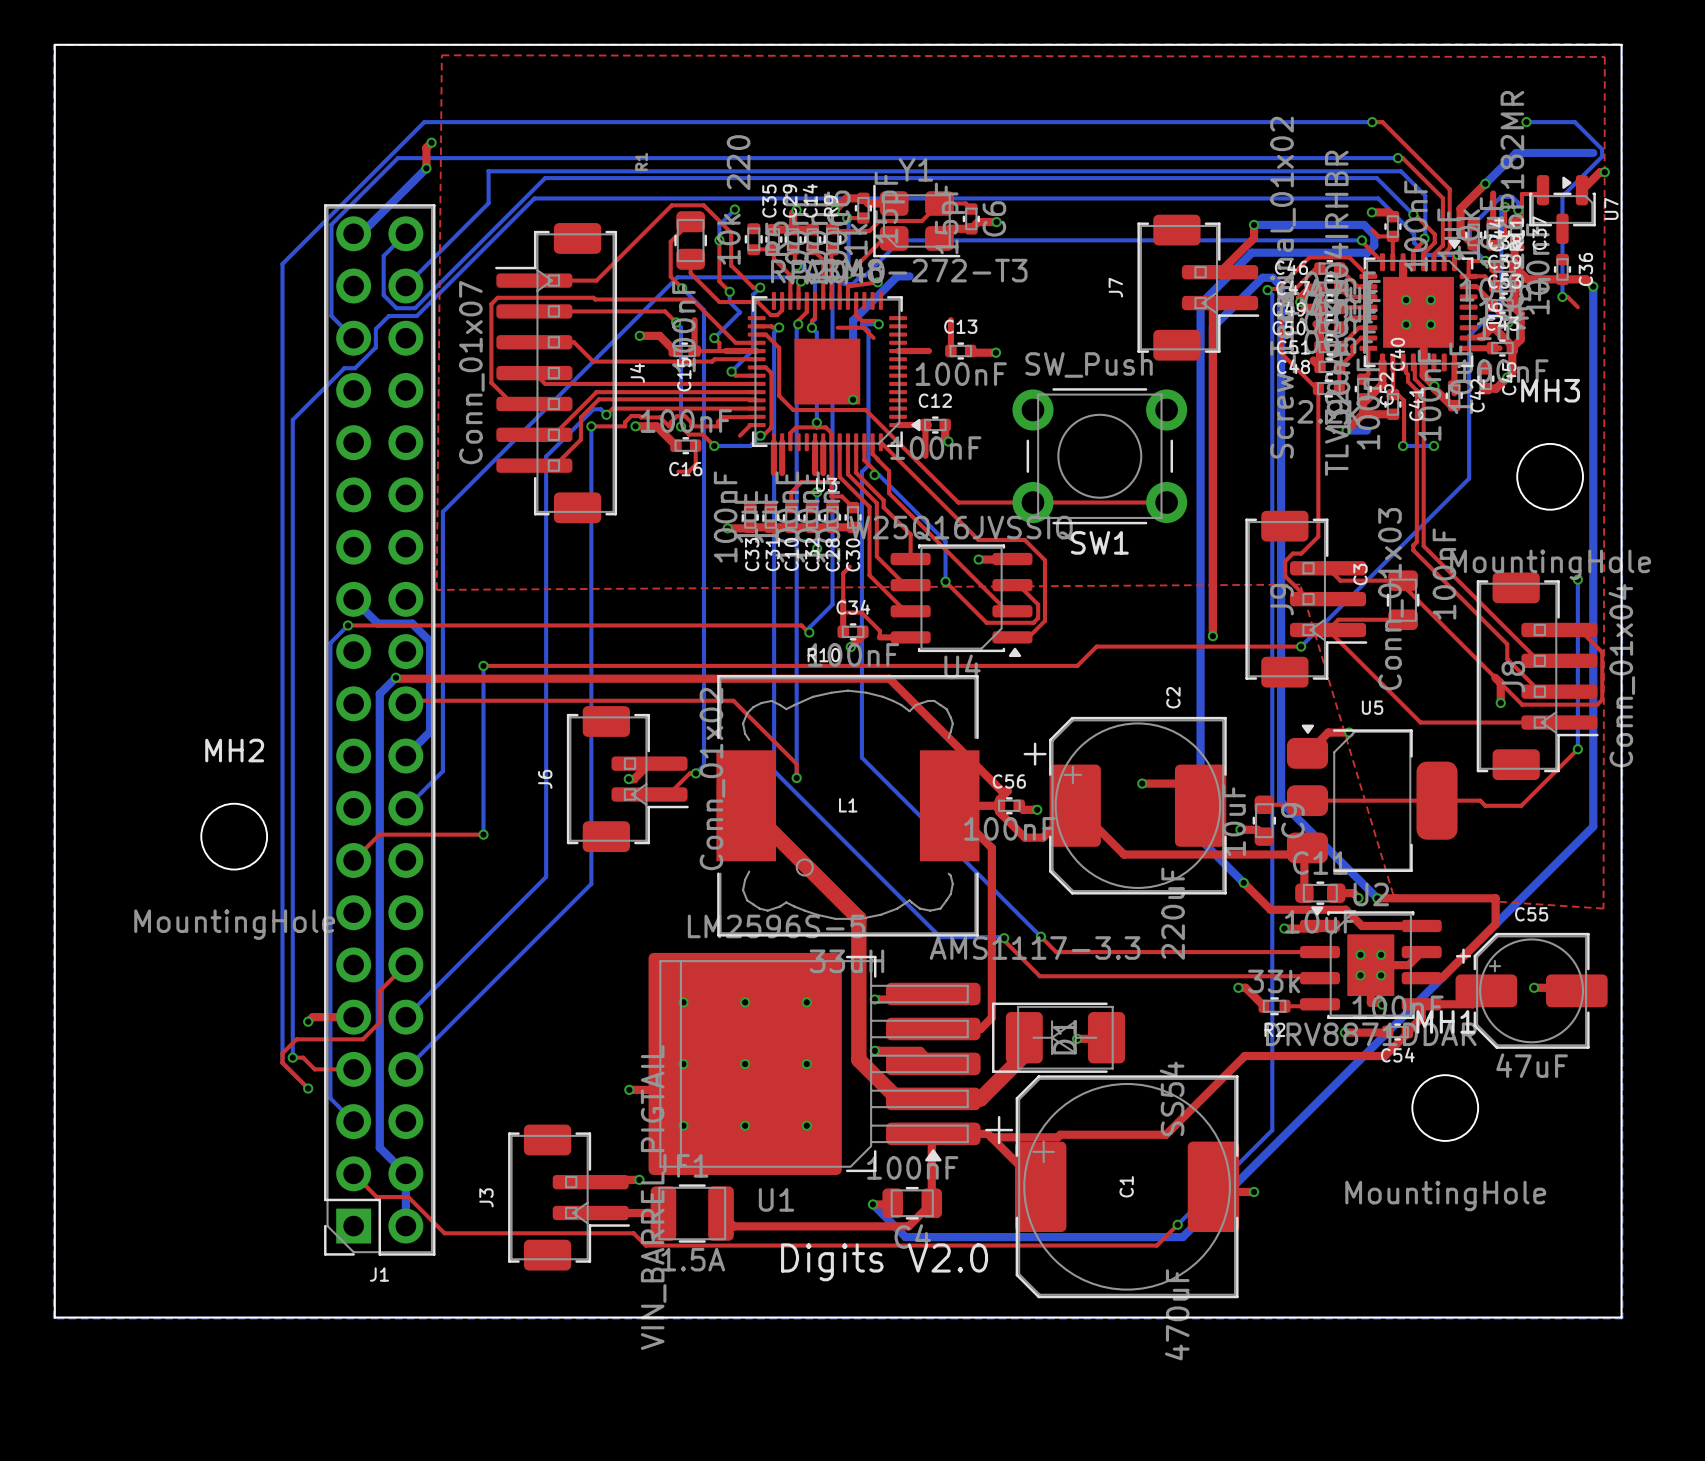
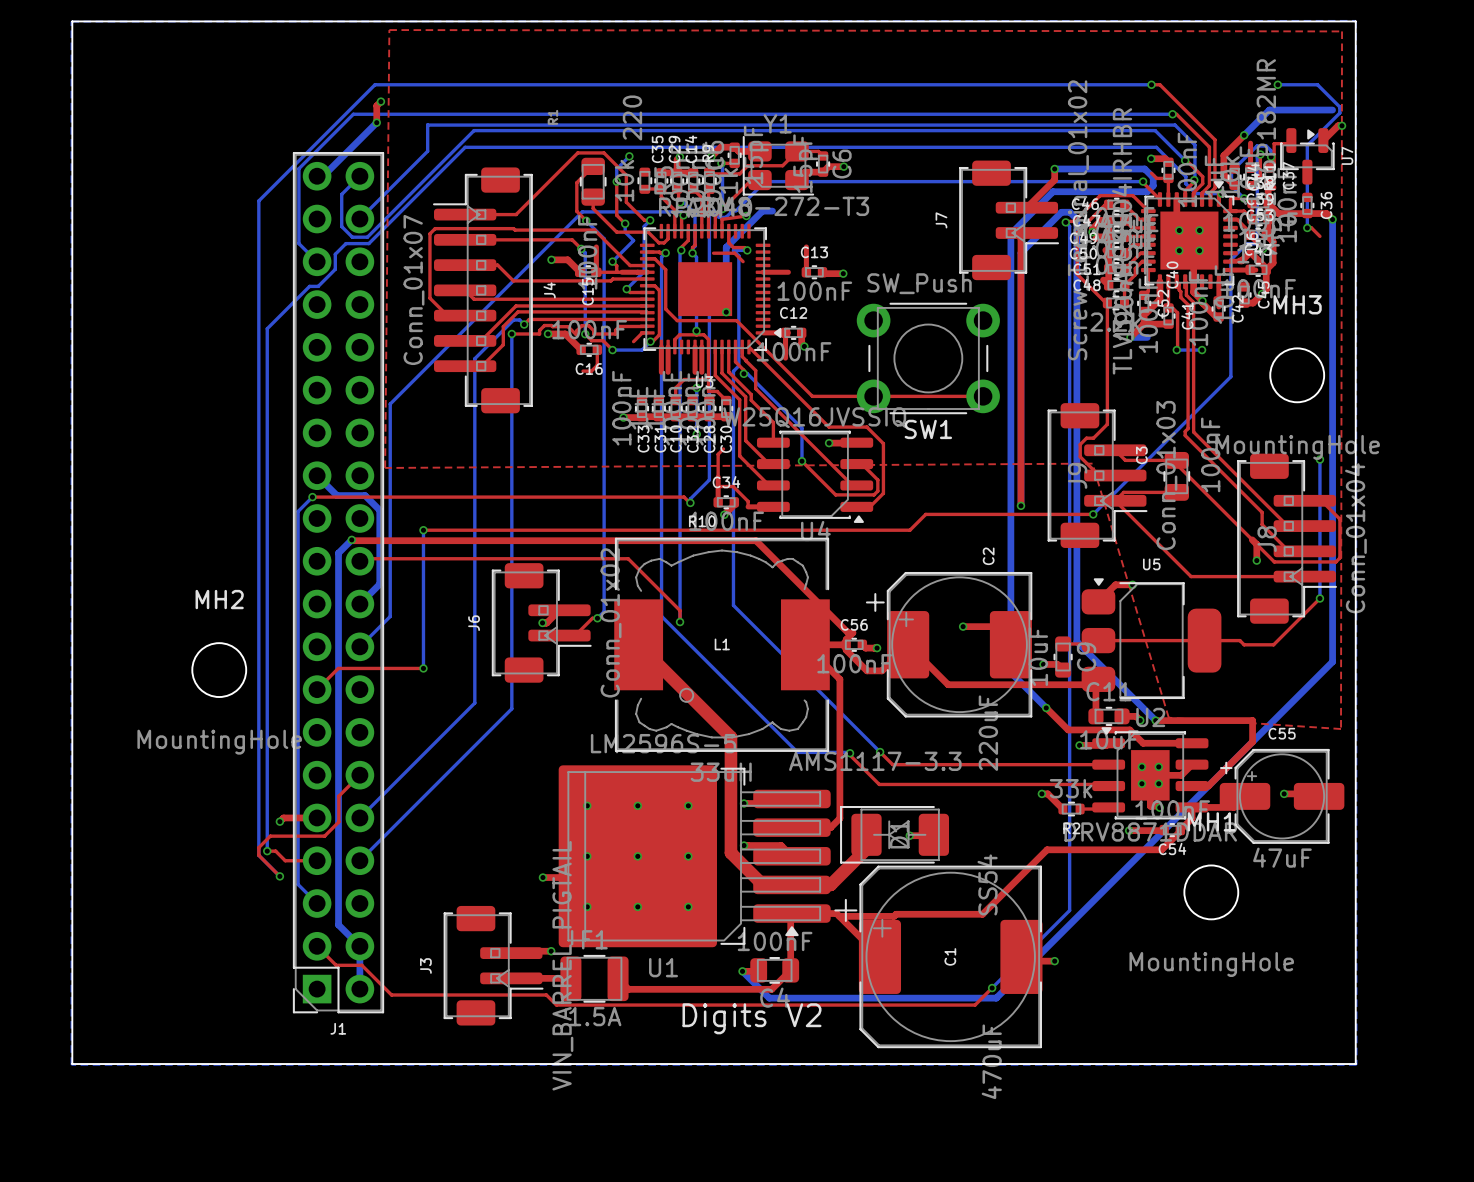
text: Digits V2.0 (884, 1262) -> Digits V2 (752, 1018)

